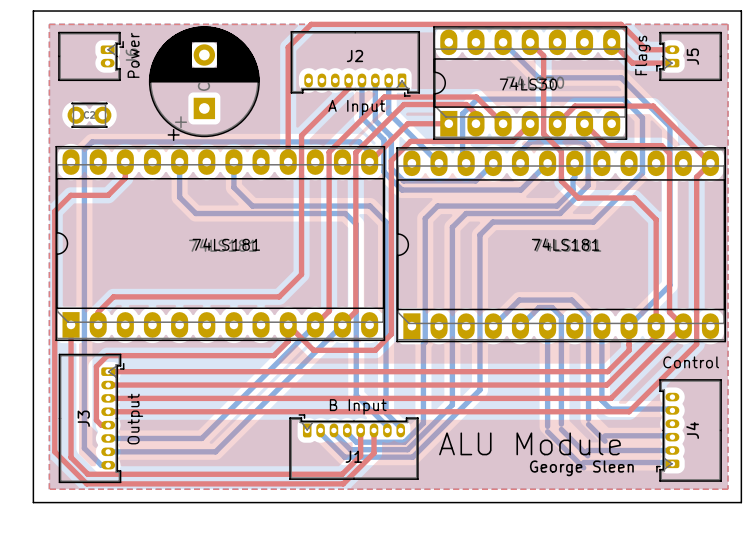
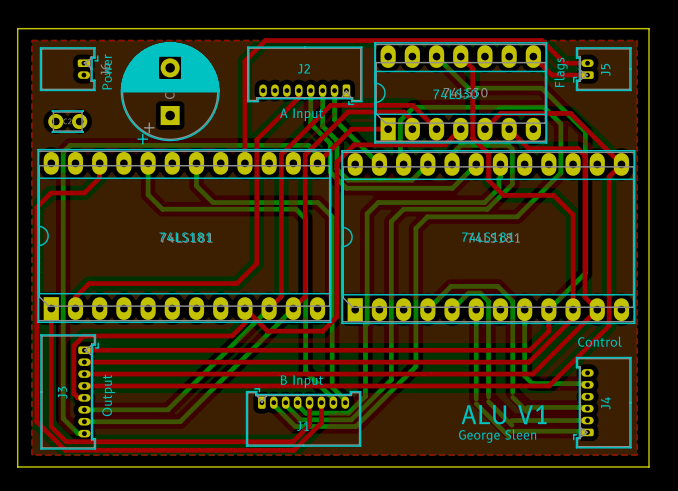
text: ALU Module (529, 443) -> none
text: none -> ALU V1 (504, 414)

